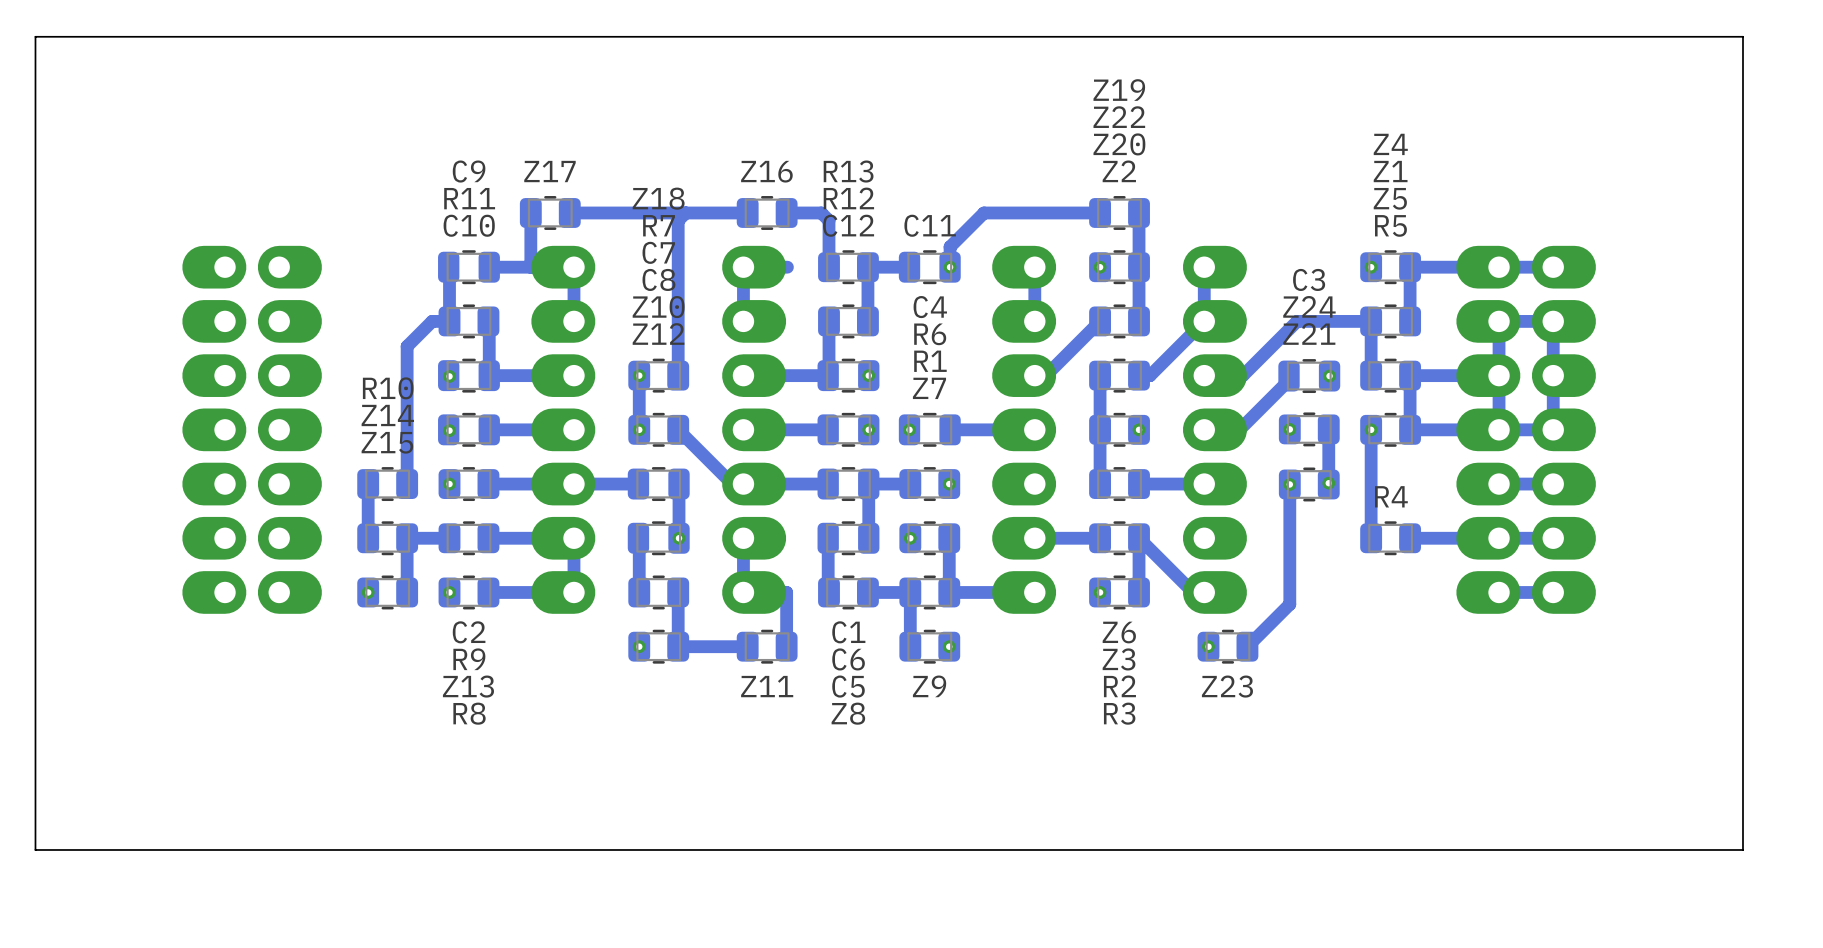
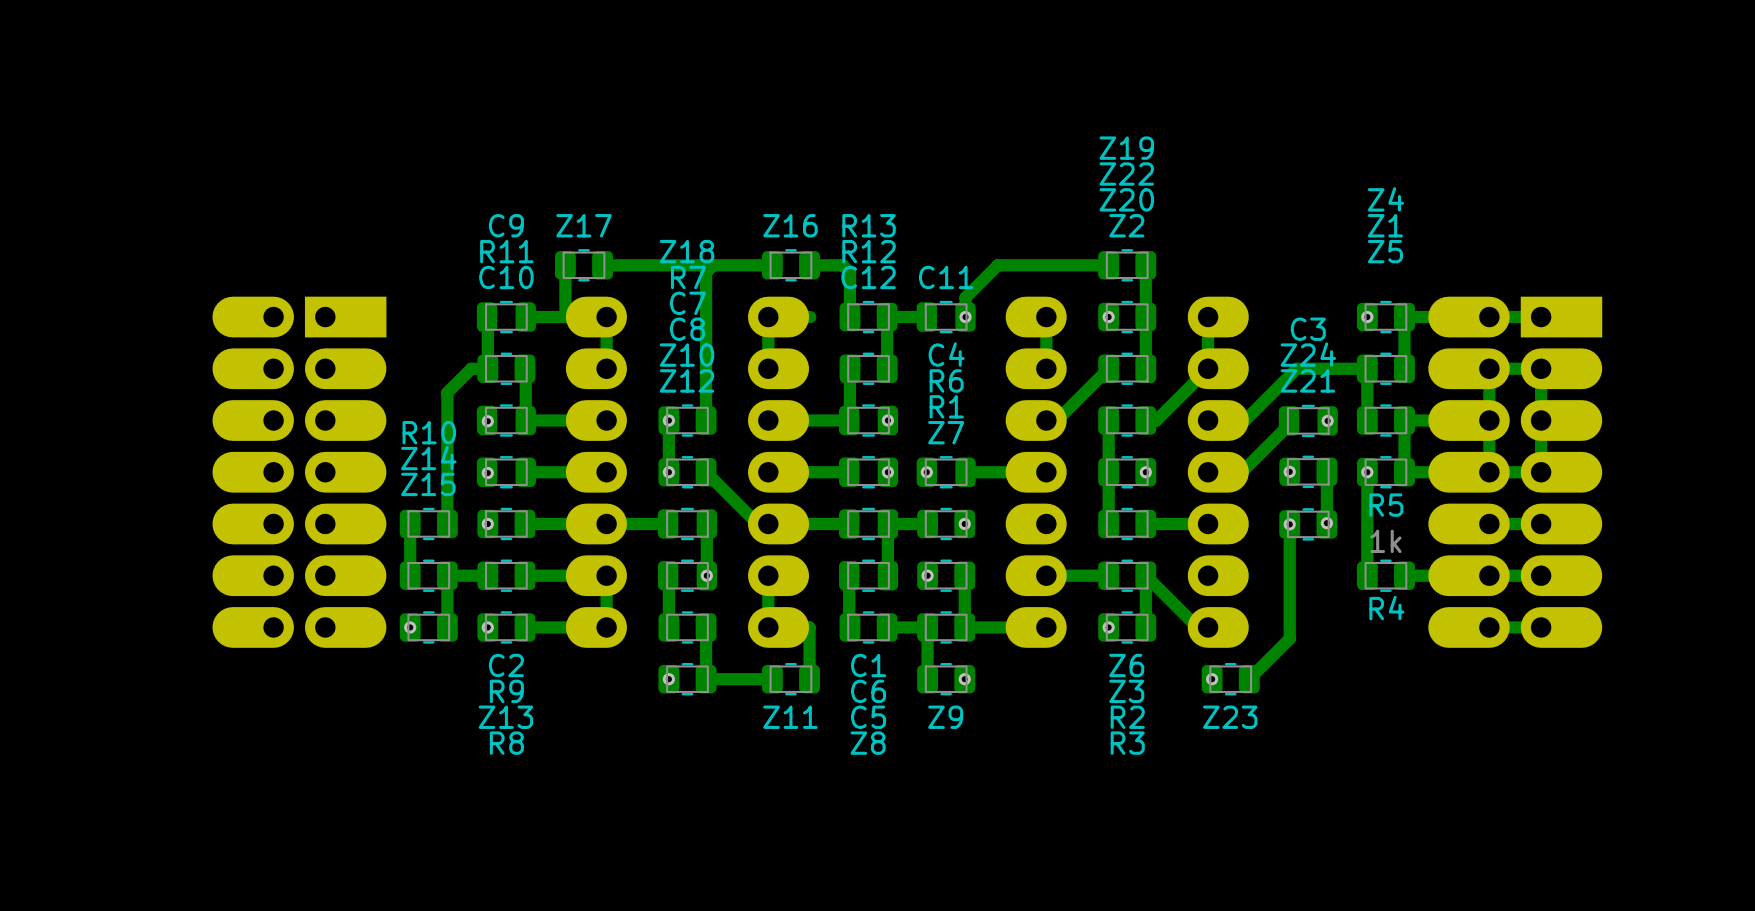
board edge: (1742, 36) (35, 36) (35, 849) (1742, 849) (1742, 36) -> none
R5 name position: R5 (1390, 225) -> R5 (1386, 505)
part footprint: [182, 245, 322, 614] -> [212, 296, 387, 648]
part footprint: [1456, 245, 1596, 614] -> [1428, 296, 1603, 648]
R4 name position: R4 (1391, 496) -> R4 (1386, 608)
R4 value: none -> 1k (1385, 541)

